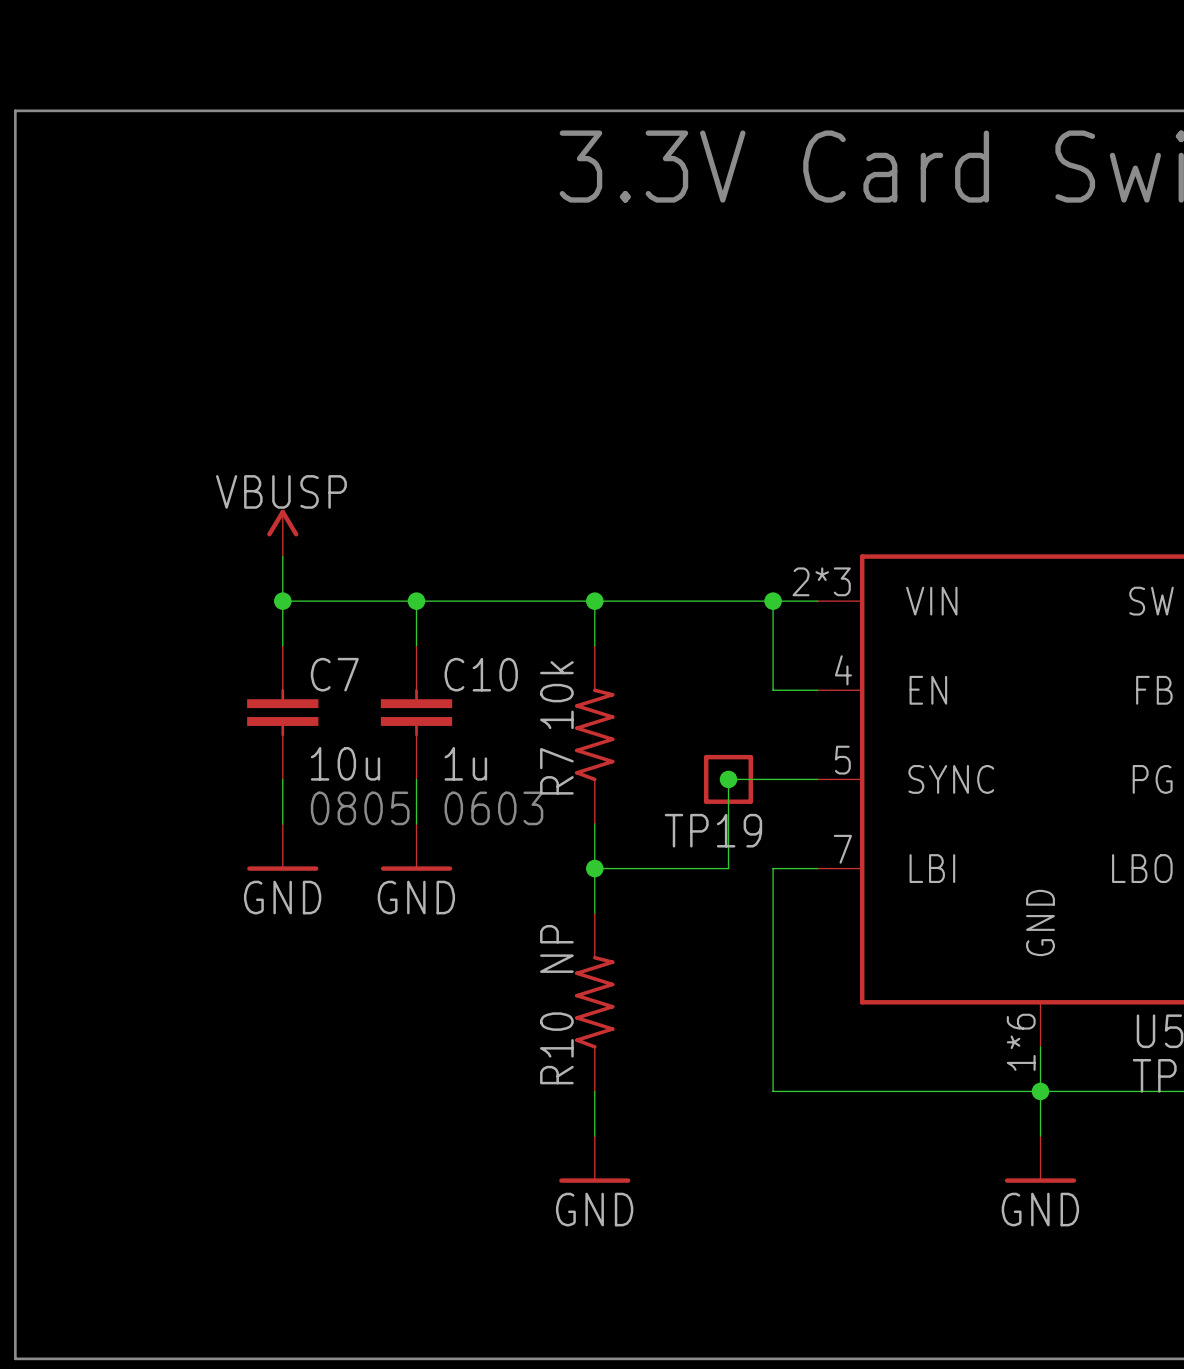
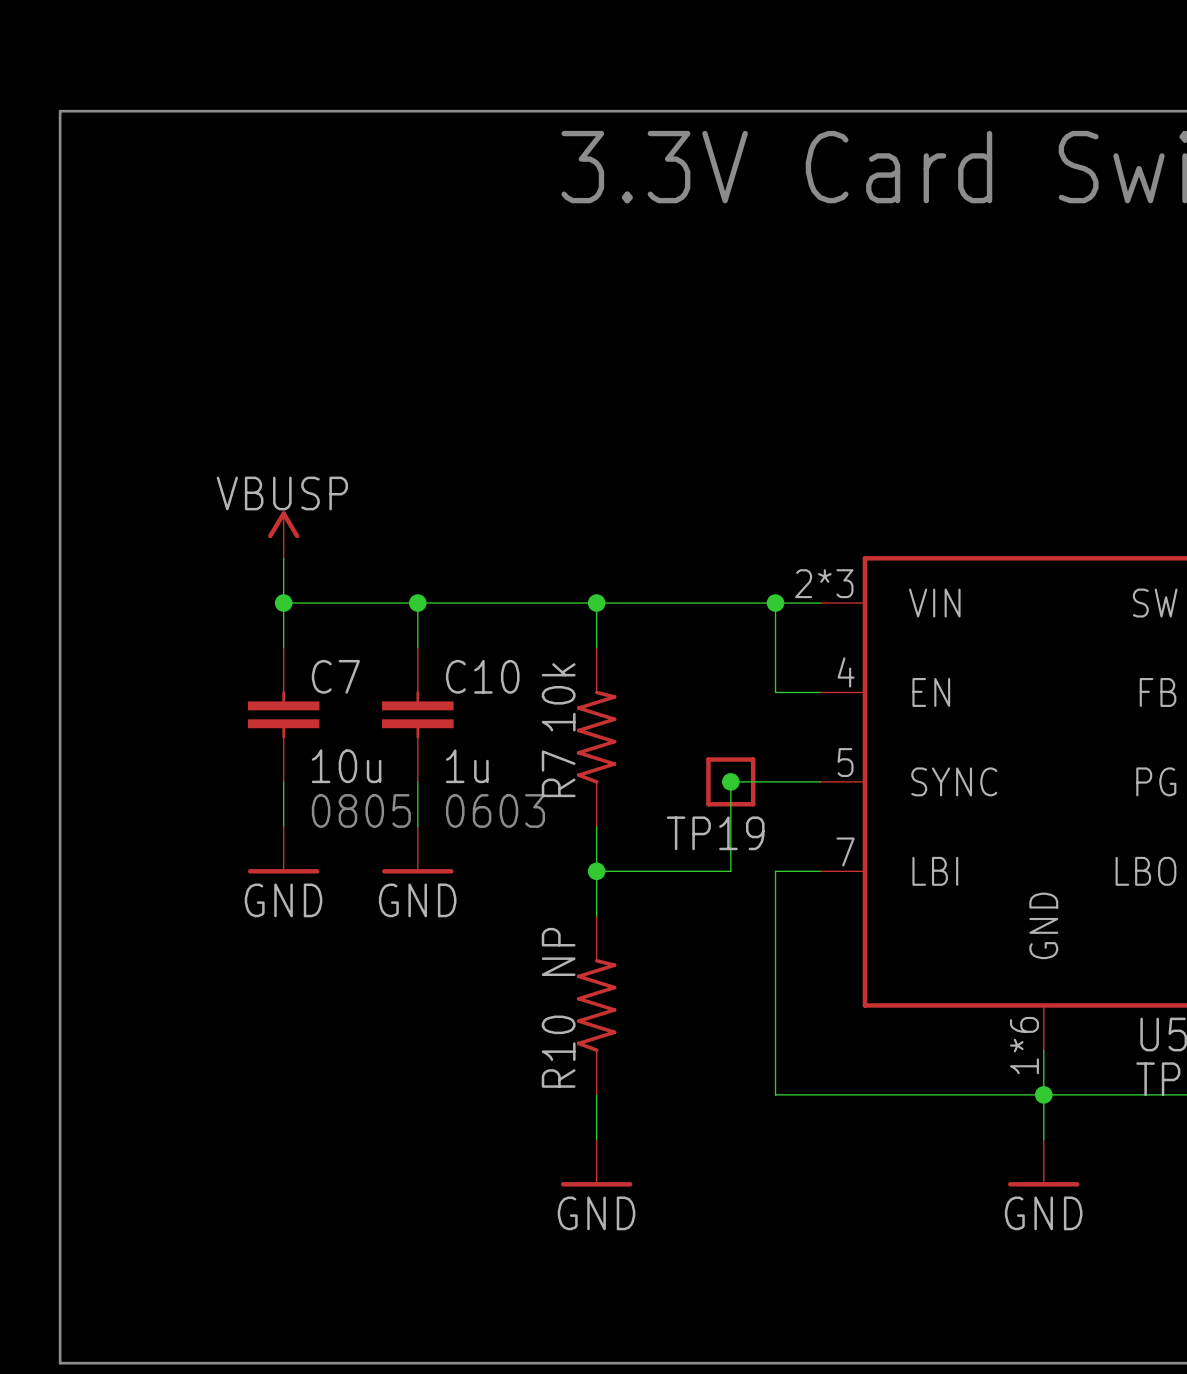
line: (59, 110) (15, 110) (15, 1358) (59, 1358) -> (60, 111) (60, 1363)

